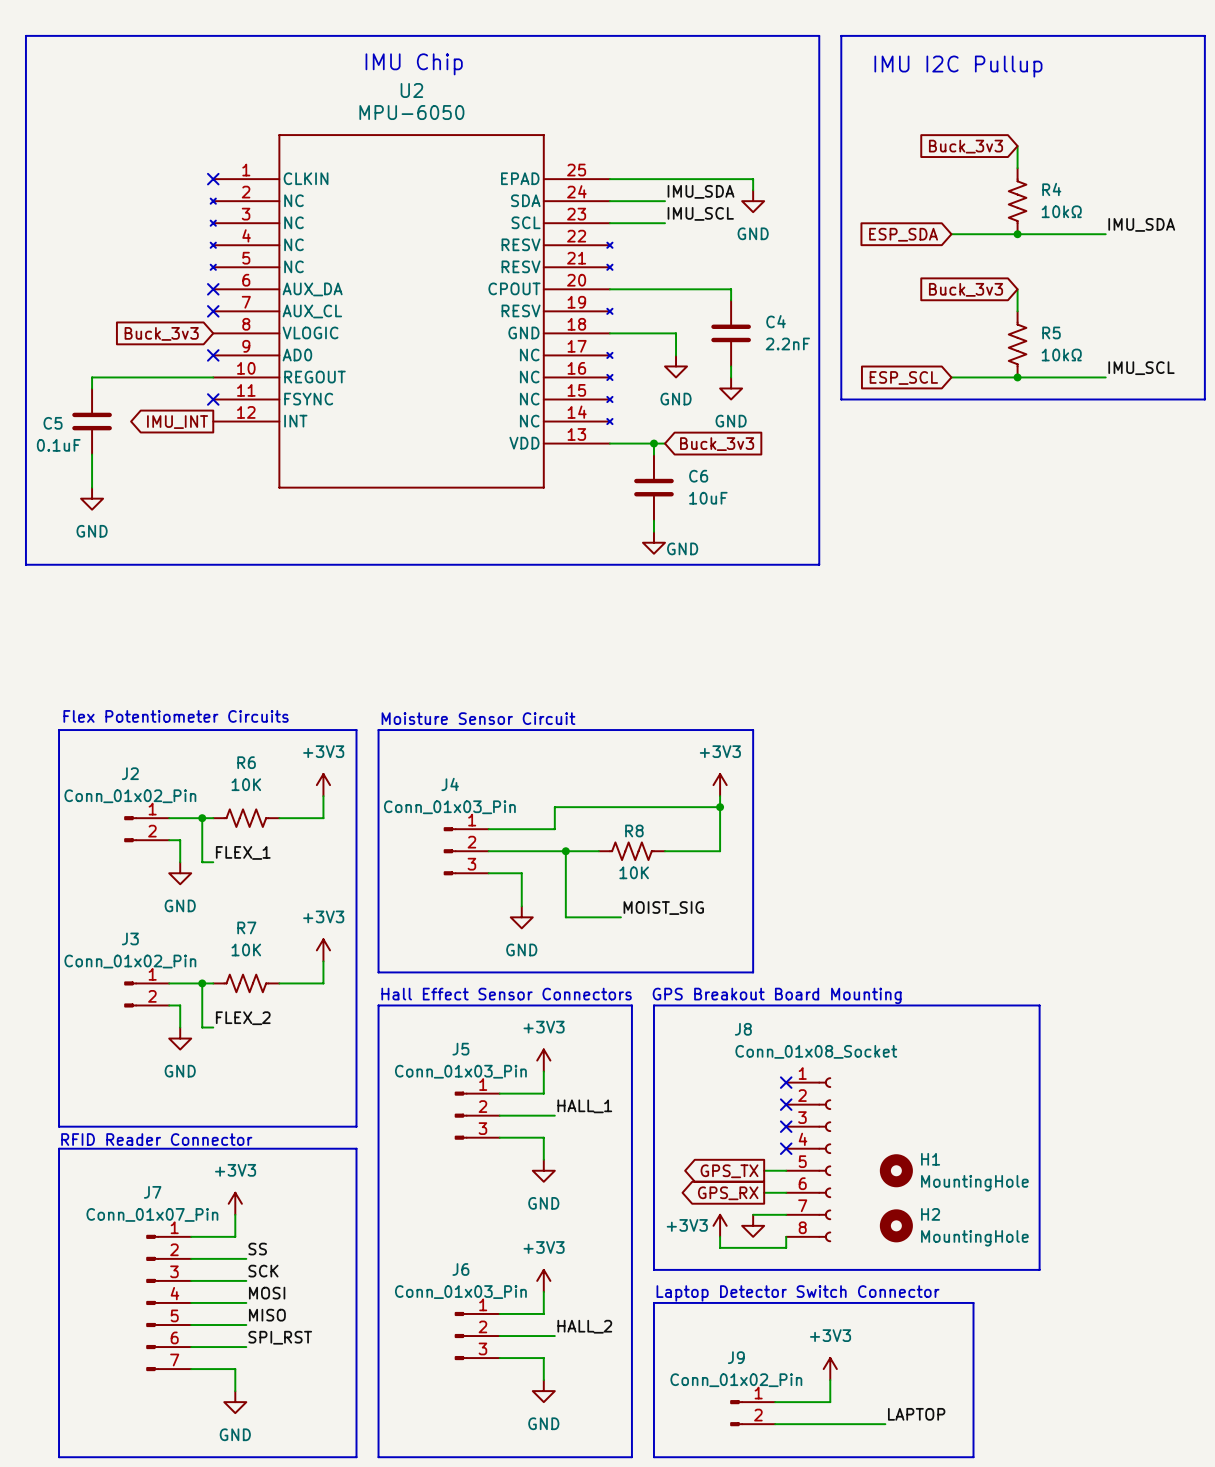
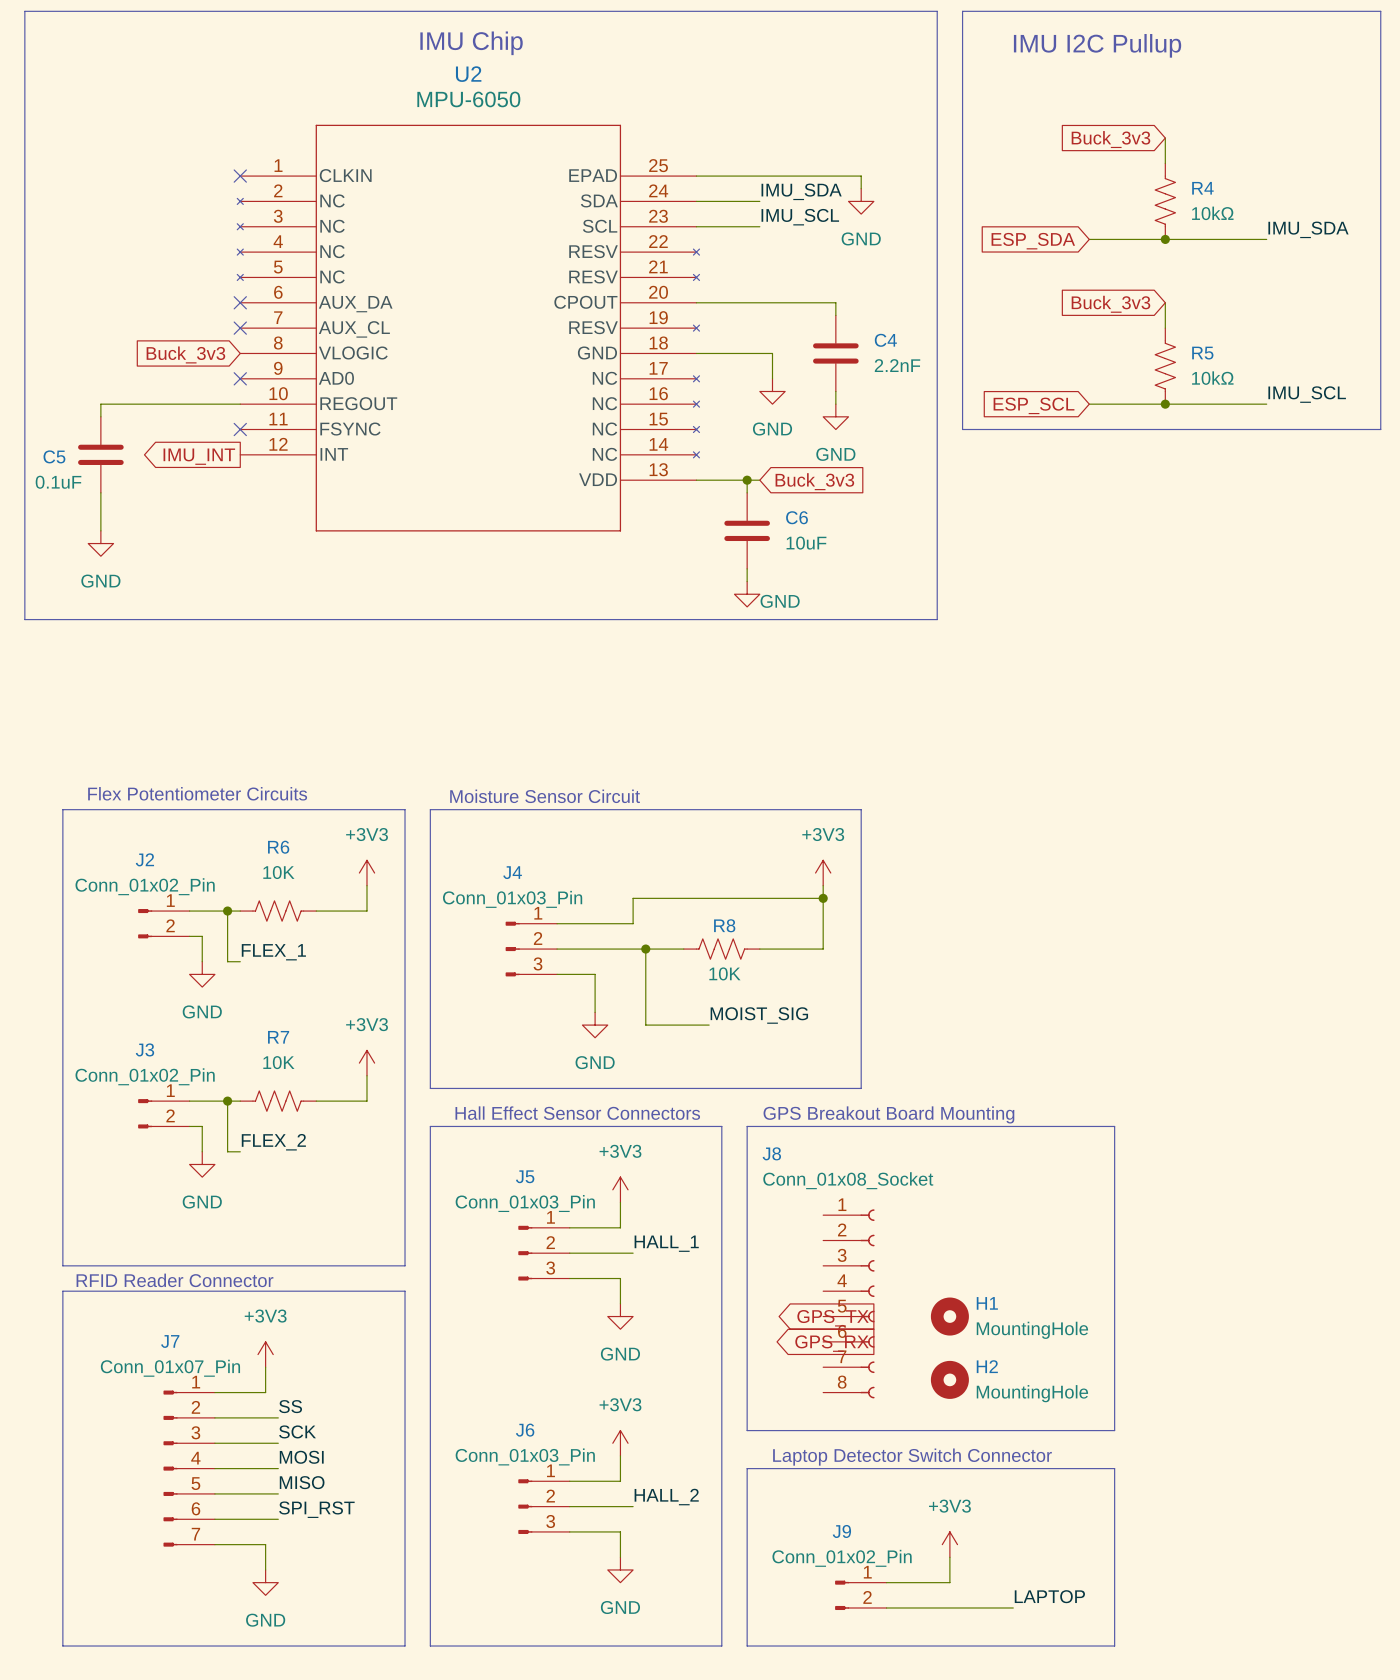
line: (973, 1005) (1039, 1005) (1039, 1269) (973, 1269) -> (1114, 1126) (1114, 1430)
no-connect mark: (786, 1082) -> none
no-connect mark: (786, 1104) -> none
no-connect mark: (786, 1126) -> none
no-connect mark: (786, 1148) -> none
J8 position: (808, 1159) -> (848, 1303)
wire: (764, 1170) (786, 1170) -> none
H1 position: (896, 1170) -> (949, 1316)
wire: (764, 1192) (786, 1192) -> none
wire: (753, 1214) (786, 1214) -> none
power symbol: +3V3 (720, 1225) -> none
power symbol: (753, 1225) -> none
H2 position: (896, 1225) -> (949, 1379)
wire: (720, 1236) (720, 1247) (786, 1247) (786, 1236) -> none

